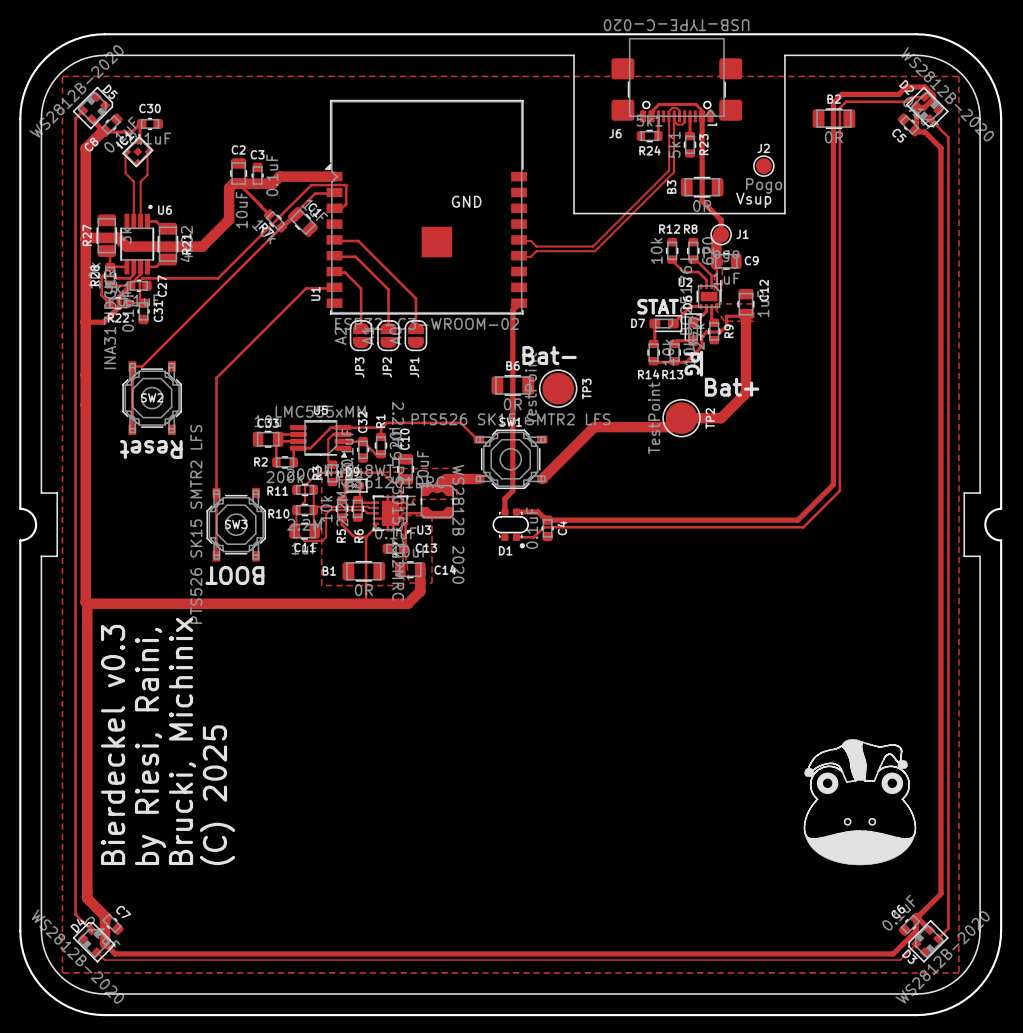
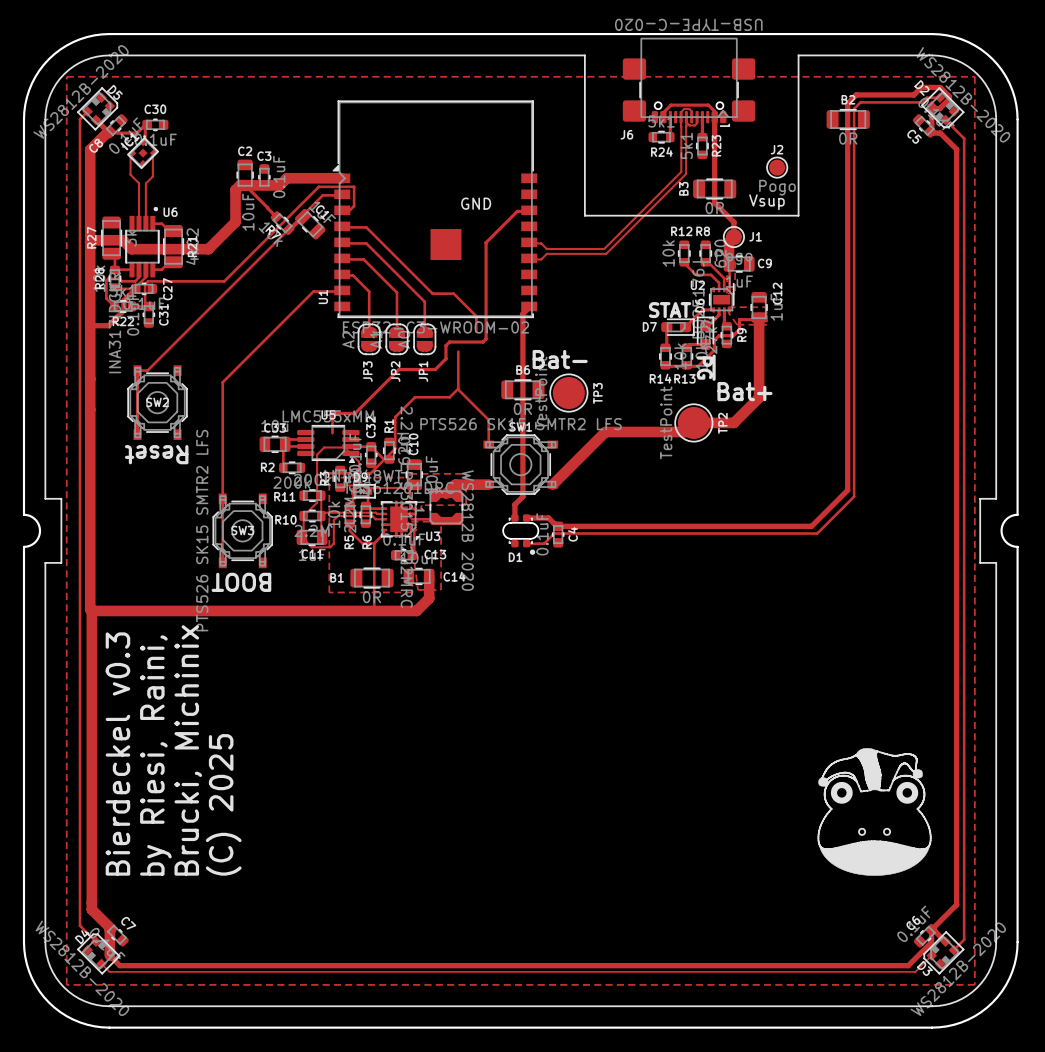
top track: none -> (529, 211) (517, 211) (486, 242) (486, 338) (483, 342) (449, 342) (446, 345) (446, 358) (435, 369) (398, 369) (355, 413) (332, 413) (332, 433)
top track: none -> (342, 227) (366, 227) (432, 293) (453, 293) (476, 316) (476, 331)
top track: none -> (458, 388) (449, 397) (415, 397) (395, 417) (395, 448) (370, 473) (366, 473)
top track: (382, 427) (331, 427) (310, 448) (293, 448) (293, 462) -> none
top track: (343, 434) (333, 434) (328, 439) (328, 460) (332, 464) -> none
top track: (381, 436) (381, 428) (386, 422) (460, 422) (479, 439) -> (458, 351) (458, 389) (488, 420) (488, 444)
top track: none -> (325, 473) (350, 473)
top track: (391, 482) (382, 473) (317, 473) (305, 485) (305, 501) -> (400, 487) (365, 487) (358, 480) (358, 461) (344, 447) (324, 447) (317, 454) (317, 502) (312, 507)

